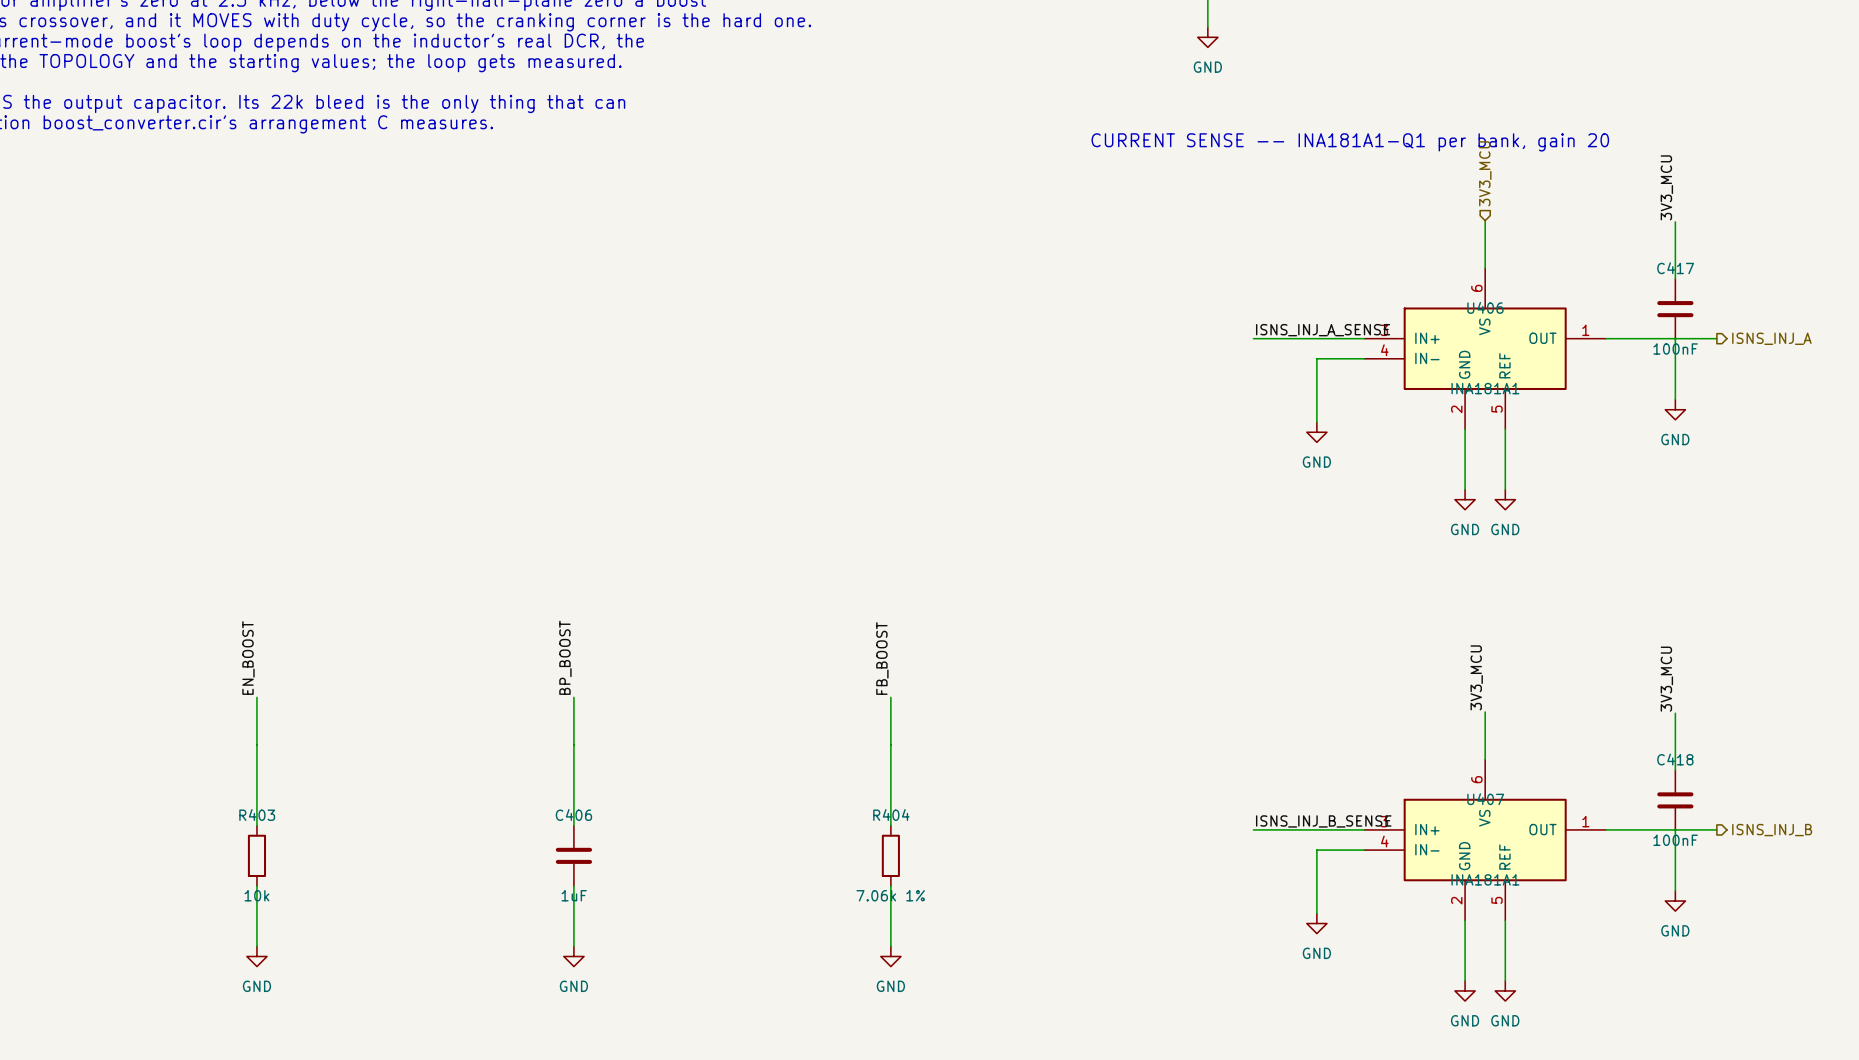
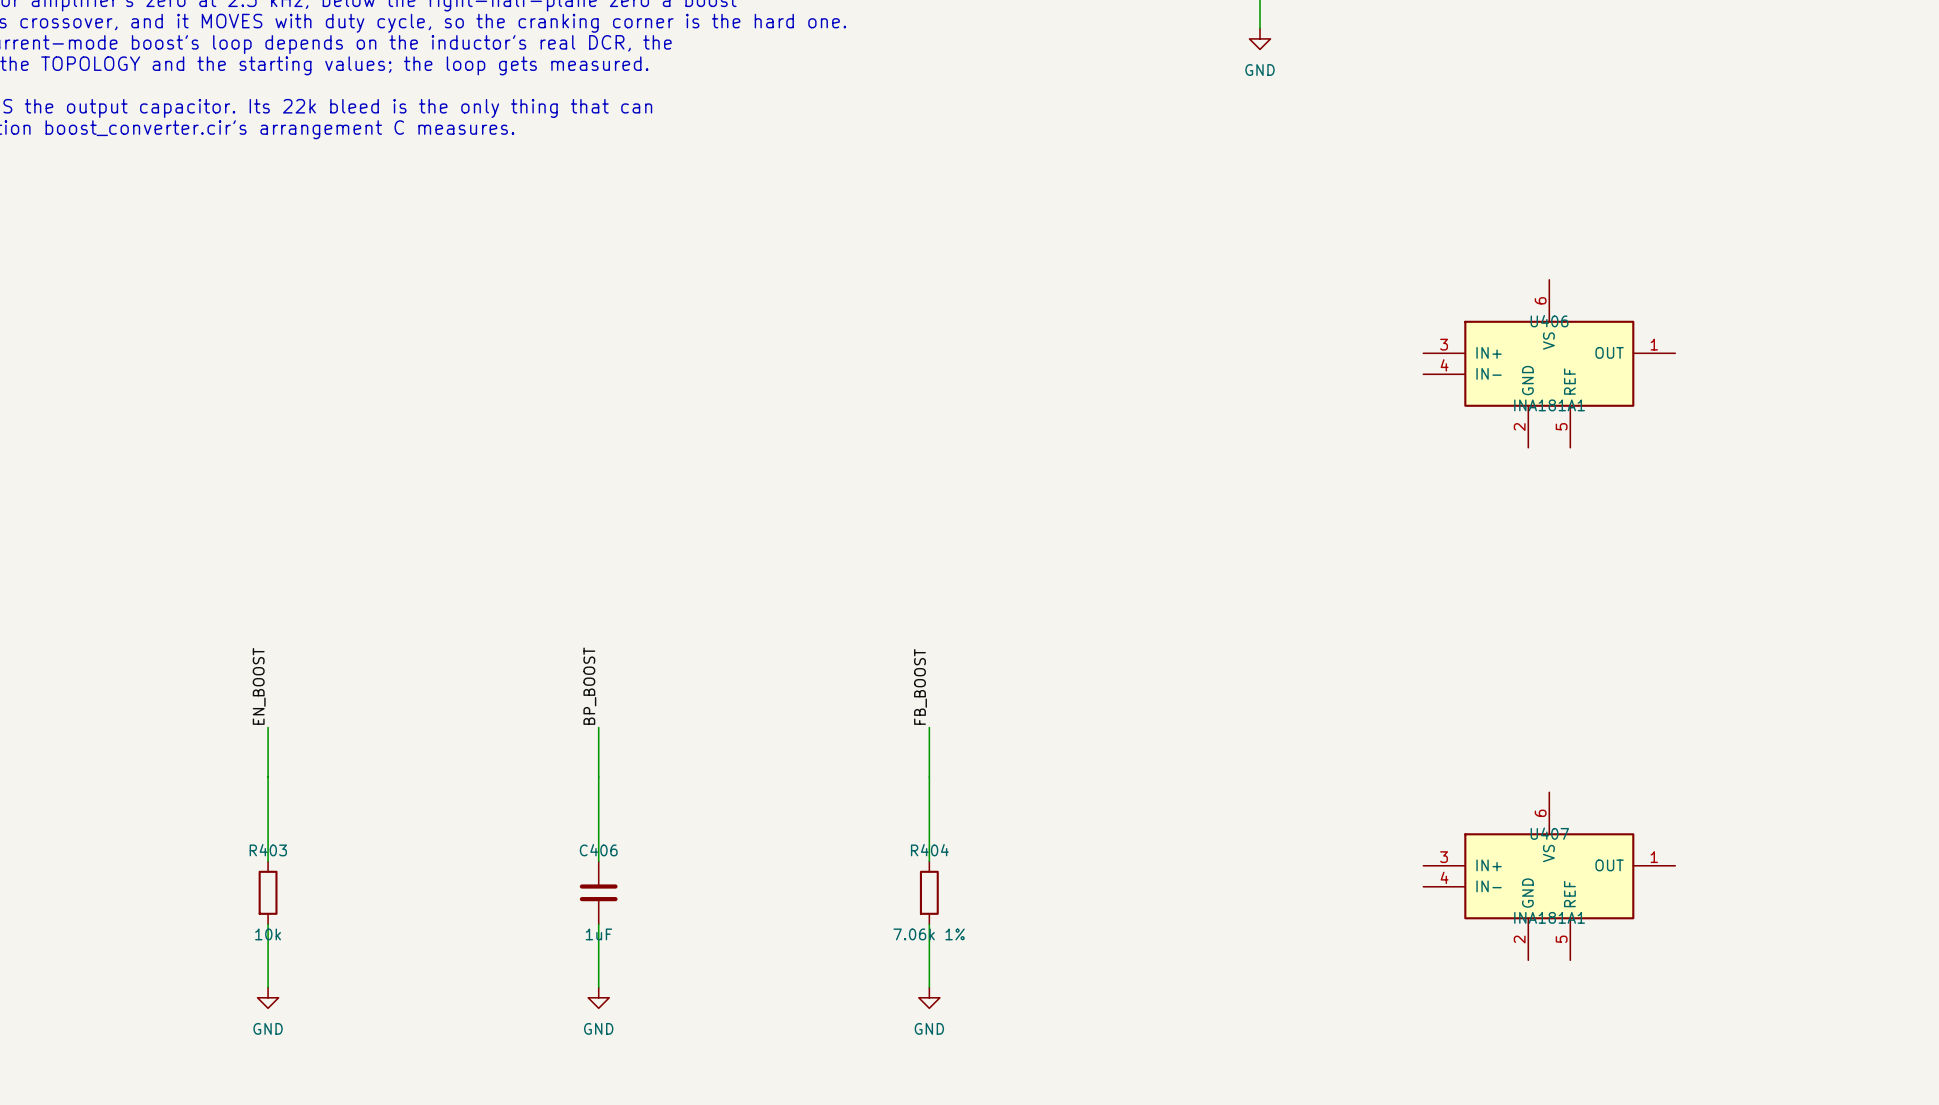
text: CURRENT SENSE -- INA181A1-Q1 per bank, gain 20 (1350, 142) -> none
hierarchical label: 3V3_MCU (1485, 173) -> none
label: 3V3_MCU (1666, 187) -> none
wire: (1485, 220) (1485, 268) -> none
wire: (1675, 221) (1675, 278) -> none
C417: 100nF (1675, 309) -> none
label: ISNS_INJ_A_SENSE (1323, 330) -> none
wire: (1253, 338) (1364, 338) -> none
wire: (1605, 338) (1716, 338) -> none
hierarchical label: ISNS_INJ_A (1771, 338) -> none
wire: (1675, 339) (1675, 399) -> none
wire: (1364, 358) (1316, 358) (1316, 422) -> none
power symbol: GND (1675, 409) -> none
wire: (1465, 429) (1465, 489) -> none
wire: (1505, 429) (1505, 489) -> none
power symbol: GND (1316, 432) -> none
power symbol: GND (1465, 499) -> none
power symbol: GND (1505, 499) -> none
label: 3V3_MCU (1476, 677) -> none
label: 3V3_MCU (1666, 679) -> none
wire: (1485, 711) (1485, 759) -> none
wire: (1675, 713) (1675, 770) -> none
C418: 100nF (1675, 800) -> none
label: ISNS_INJ_B_SENSE (1323, 821) -> none
wire: (1253, 829) (1364, 829) -> none
wire: (1605, 829) (1716, 829) -> none
wire: (1675, 830) (1675, 890) -> none
hierarchical label: ISNS_INJ_B (1772, 830) -> none
wire: (1364, 850) (1316, 850) (1316, 913) -> none
power symbol: GND (1675, 901) -> none
wire: (1465, 920) (1465, 980) -> none
wire: (1505, 920) (1505, 980) -> none
power symbol: GND (1316, 923) -> none
power symbol: GND (1465, 990) -> none
power symbol: GND (1505, 990) -> none

